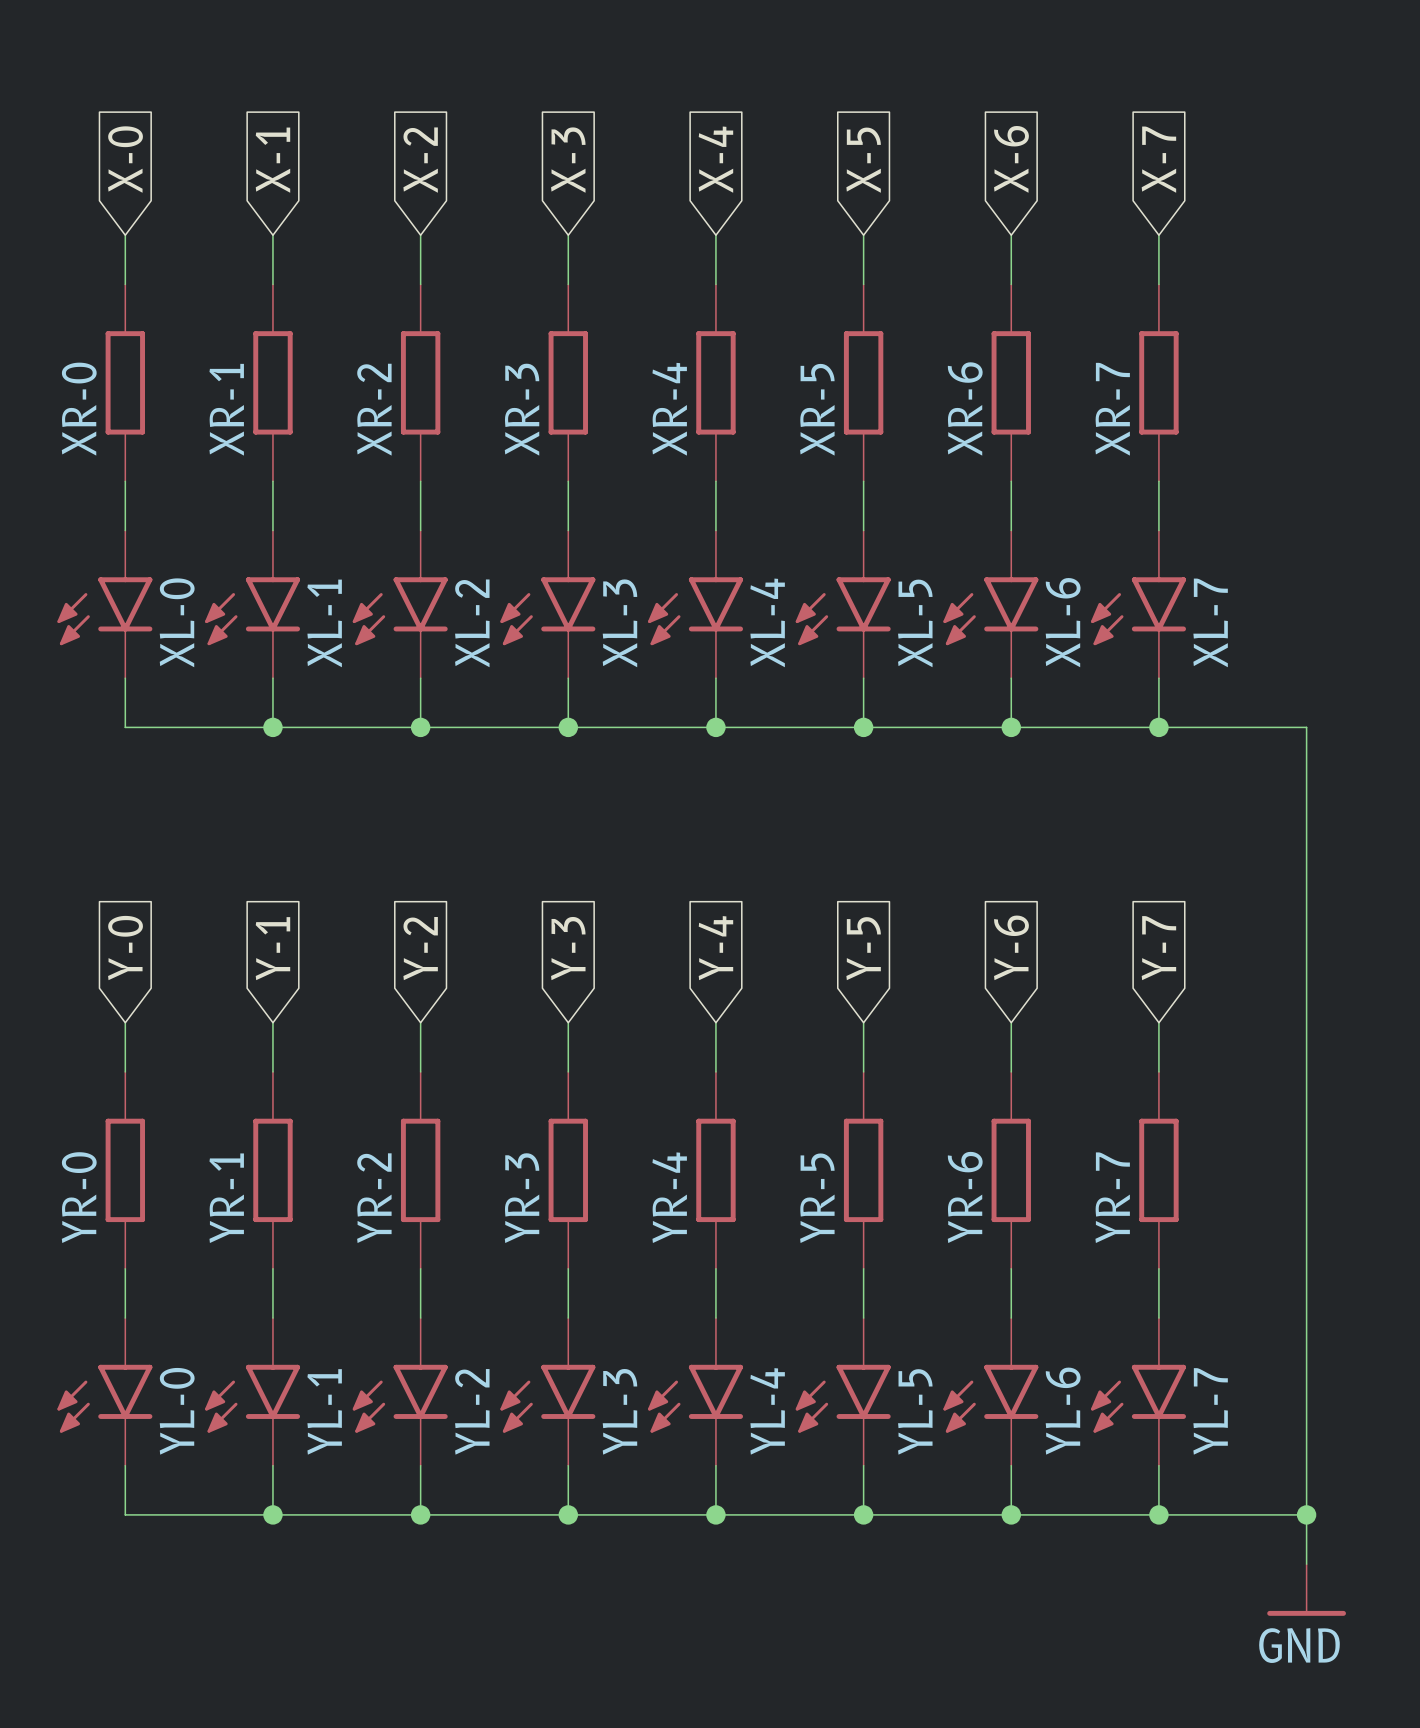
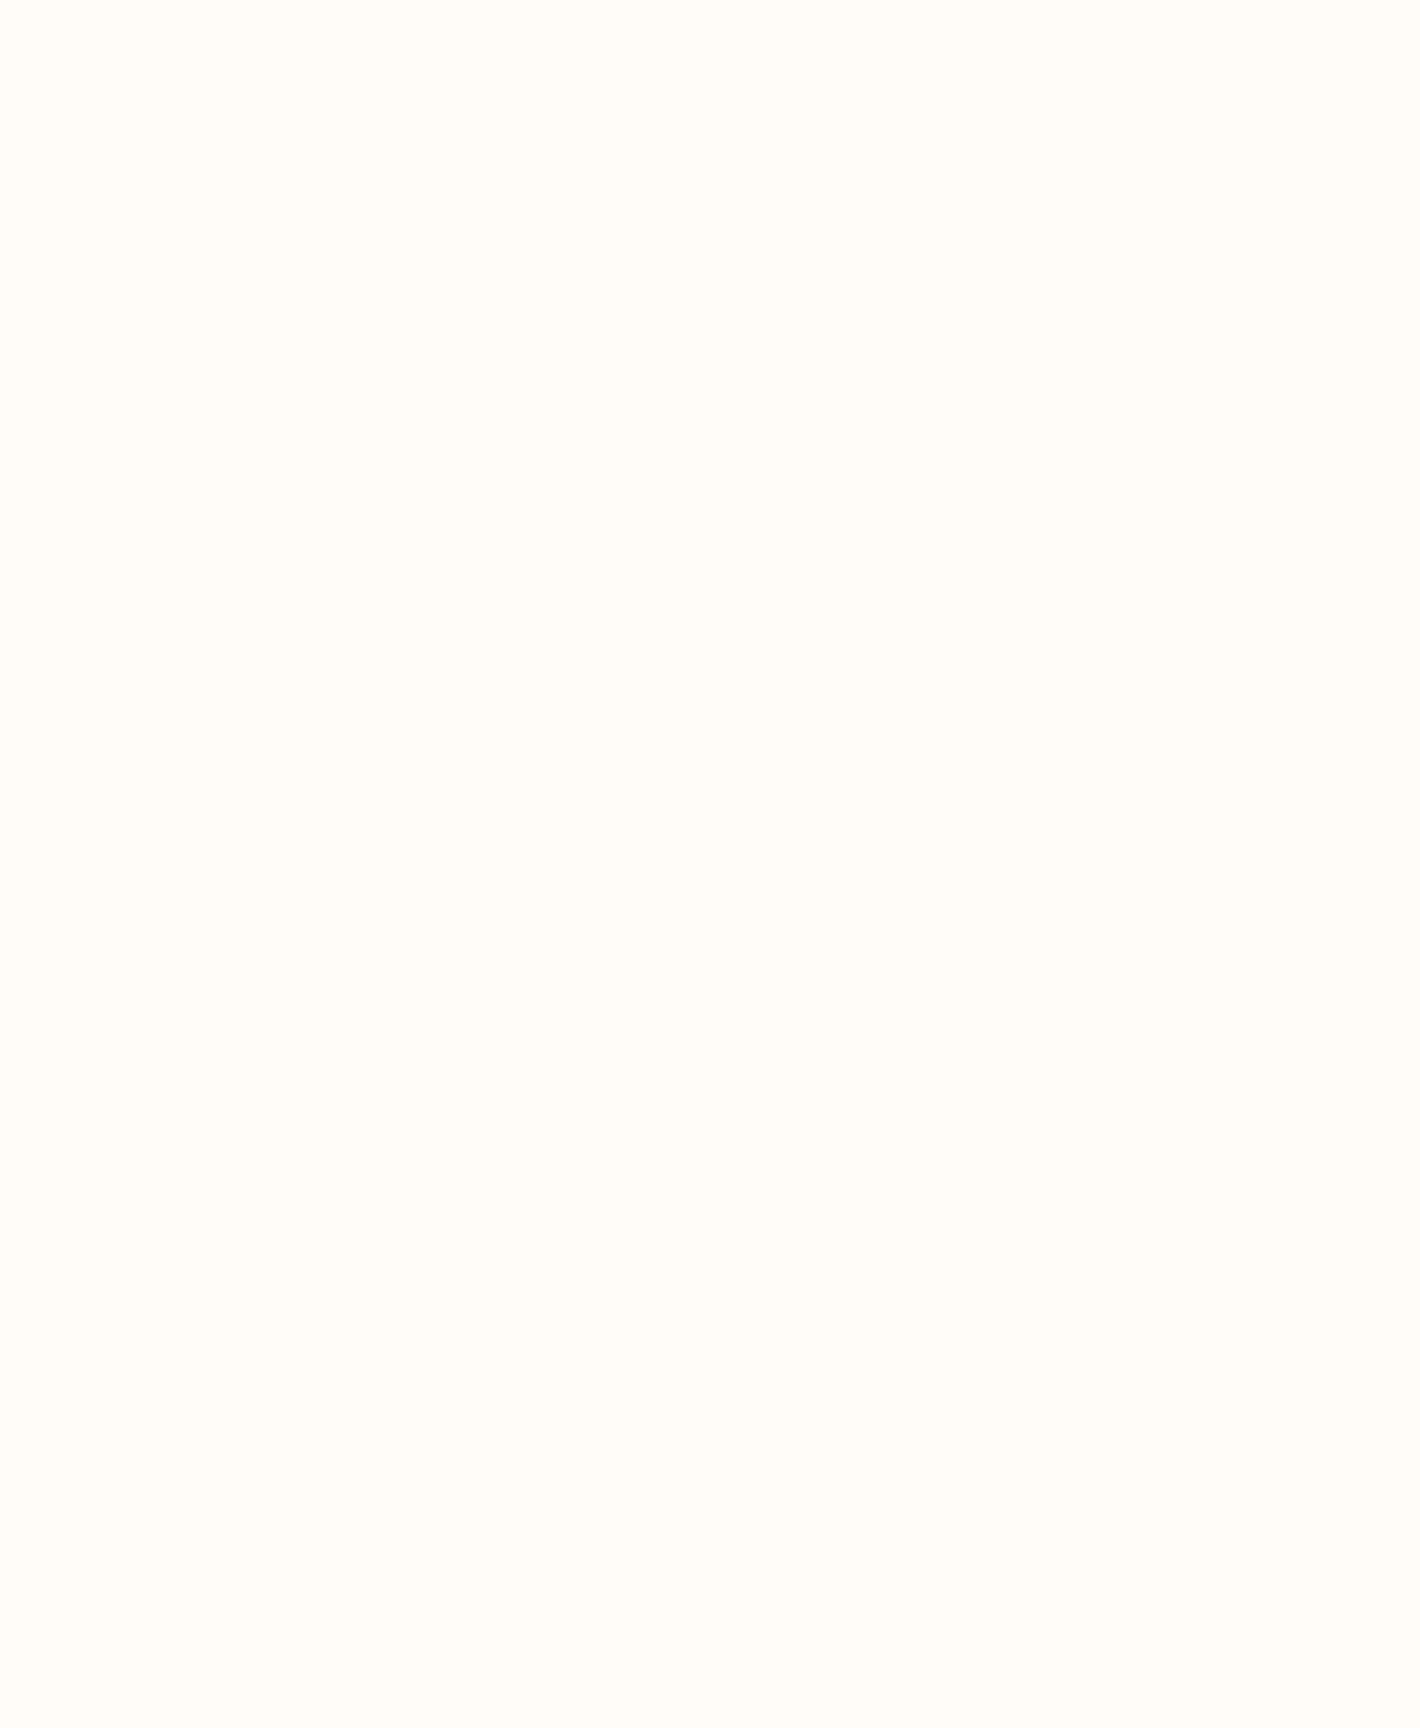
global label: X-0 (125, 159) -> none
global label: X-4 (715, 159) -> none
global label: X-6 (1011, 159) -> none
global label: X-7 (1158, 159) -> none
global label: X-1 (272, 160) -> none
global label: X-2 (420, 160) -> none
global label: X-3 (568, 160) -> none
global label: X-5 (863, 160) -> none
wire: (125, 235) (125, 284) -> none
wire: (272, 235) (272, 284) -> none
wire: (420, 235) (420, 284) -> none
wire: (568, 235) (568, 284) -> none
wire: (715, 235) (715, 284) -> none
wire: (863, 235) (863, 284) -> none
wire: (1011, 235) (1011, 284) -> none
wire: (1158, 235) (1158, 284) -> none
XR-0: (125, 382) -> none
XR-1: (272, 382) -> none
XR-2: (420, 382) -> none
XR-3: (568, 382) -> none
XR-4: (715, 382) -> none
XR-5: (863, 382) -> none
XR-6: (1011, 382) -> none
XR-7: (1158, 382) -> none
wire: (125, 481) (125, 530) -> none
wire: (272, 481) (272, 530) -> none
wire: (420, 481) (420, 530) -> none
wire: (568, 481) (568, 530) -> none
wire: (715, 481) (715, 530) -> none
wire: (863, 481) (863, 530) -> none
wire: (1011, 481) (1011, 530) -> none
wire: (1158, 481) (1158, 530) -> none
XL-0: (104, 604) -> none
XL-1: (252, 604) -> none
XL-2: (400, 604) -> none
XL-3: (547, 604) -> none
XL-4: (695, 604) -> none
XL-5: (843, 604) -> none
XL-6: (990, 604) -> none
XL-7: (1138, 604) -> none
wire: (125, 678) (125, 727) (1306, 727) (1306, 1564) -> none
wire: (272, 678) (272, 727) -> none
wire: (420, 678) (420, 727) -> none
wire: (568, 678) (568, 727) -> none
wire: (715, 678) (715, 727) -> none
wire: (863, 678) (863, 727) -> none
wire: (1011, 678) (1011, 727) -> none
wire: (1158, 678) (1158, 727) -> none
junction: (272, 727) -> none
junction: (420, 727) -> none
junction: (568, 727) -> none
junction: (715, 727) -> none
junction: (863, 727) -> none
junction: (1011, 727) -> none
junction: (1158, 727) -> none
global label: Y-6 (1011, 947) -> none
global label: Y-0 (125, 948) -> none
global label: Y-1 (272, 948) -> none
global label: Y-2 (420, 948) -> none
global label: Y-3 (568, 948) -> none
global label: Y-4 (715, 948) -> none
global label: Y-5 (863, 948) -> none
global label: Y-7 (1158, 948) -> none
wire: (125, 1022) (125, 1071) -> none
wire: (272, 1022) (272, 1071) -> none
wire: (420, 1022) (420, 1071) -> none
wire: (568, 1022) (568, 1071) -> none
wire: (715, 1022) (715, 1071) -> none
wire: (863, 1022) (863, 1071) -> none
wire: (1011, 1022) (1011, 1071) -> none
wire: (1158, 1022) (1158, 1071) -> none
YR-0: (125, 1170) -> none
YR-1: (272, 1170) -> none
YR-2: (420, 1170) -> none
YR-3: (568, 1170) -> none
YR-4: (715, 1170) -> none
YR-5: (863, 1170) -> none
YR-6: (1011, 1170) -> none
YR-7: (1158, 1170) -> none
wire: (125, 1268) (125, 1318) -> none
wire: (272, 1268) (272, 1318) -> none
wire: (420, 1268) (420, 1318) -> none
wire: (568, 1268) (568, 1318) -> none
wire: (715, 1268) (715, 1318) -> none
wire: (863, 1268) (863, 1318) -> none
wire: (1011, 1268) (1011, 1318) -> none
wire: (1158, 1268) (1158, 1318) -> none
YL-0: (104, 1391) -> none
YL-1: (252, 1391) -> none
YL-2: (400, 1391) -> none
YL-3: (547, 1391) -> none
YL-4: (695, 1391) -> none
YL-5: (843, 1391) -> none
YL-6: (990, 1391) -> none
YL-7: (1138, 1391) -> none
wire: (125, 1465) (125, 1514) (1306, 1514) -> none
wire: (272, 1465) (272, 1514) -> none
wire: (420, 1465) (420, 1514) -> none
wire: (568, 1465) (568, 1514) -> none
wire: (715, 1465) (715, 1514) -> none
wire: (863, 1465) (863, 1514) -> none
wire: (1011, 1465) (1011, 1514) -> none
wire: (1158, 1465) (1158, 1514) -> none
junction: (272, 1514) -> none
junction: (420, 1514) -> none
junction: (568, 1514) -> none
junction: (715, 1514) -> none
junction: (863, 1514) -> none
junction: (1011, 1514) -> none
junction: (1158, 1514) -> none
junction: (1306, 1514) -> none
power symbol: GND (1306, 1589) -> none

